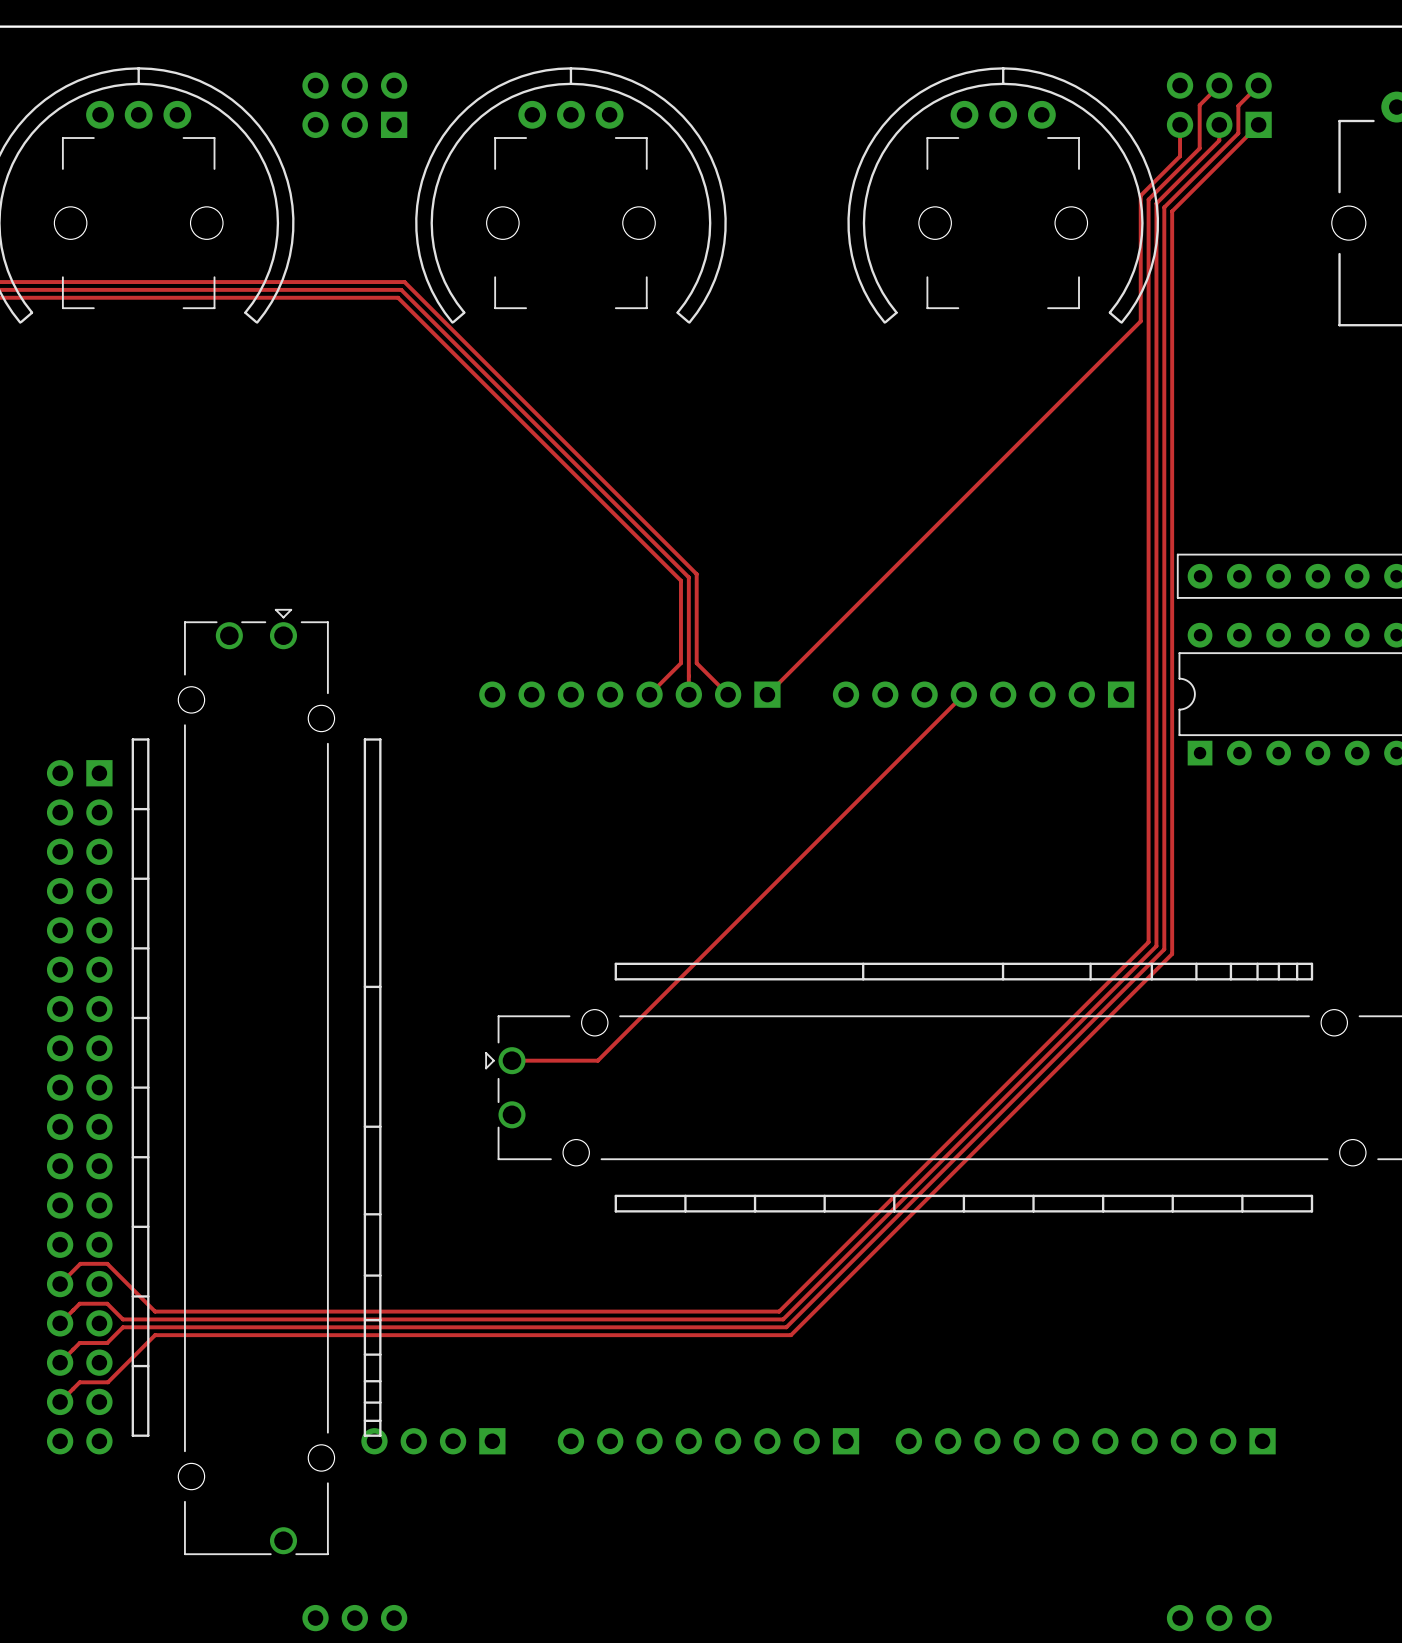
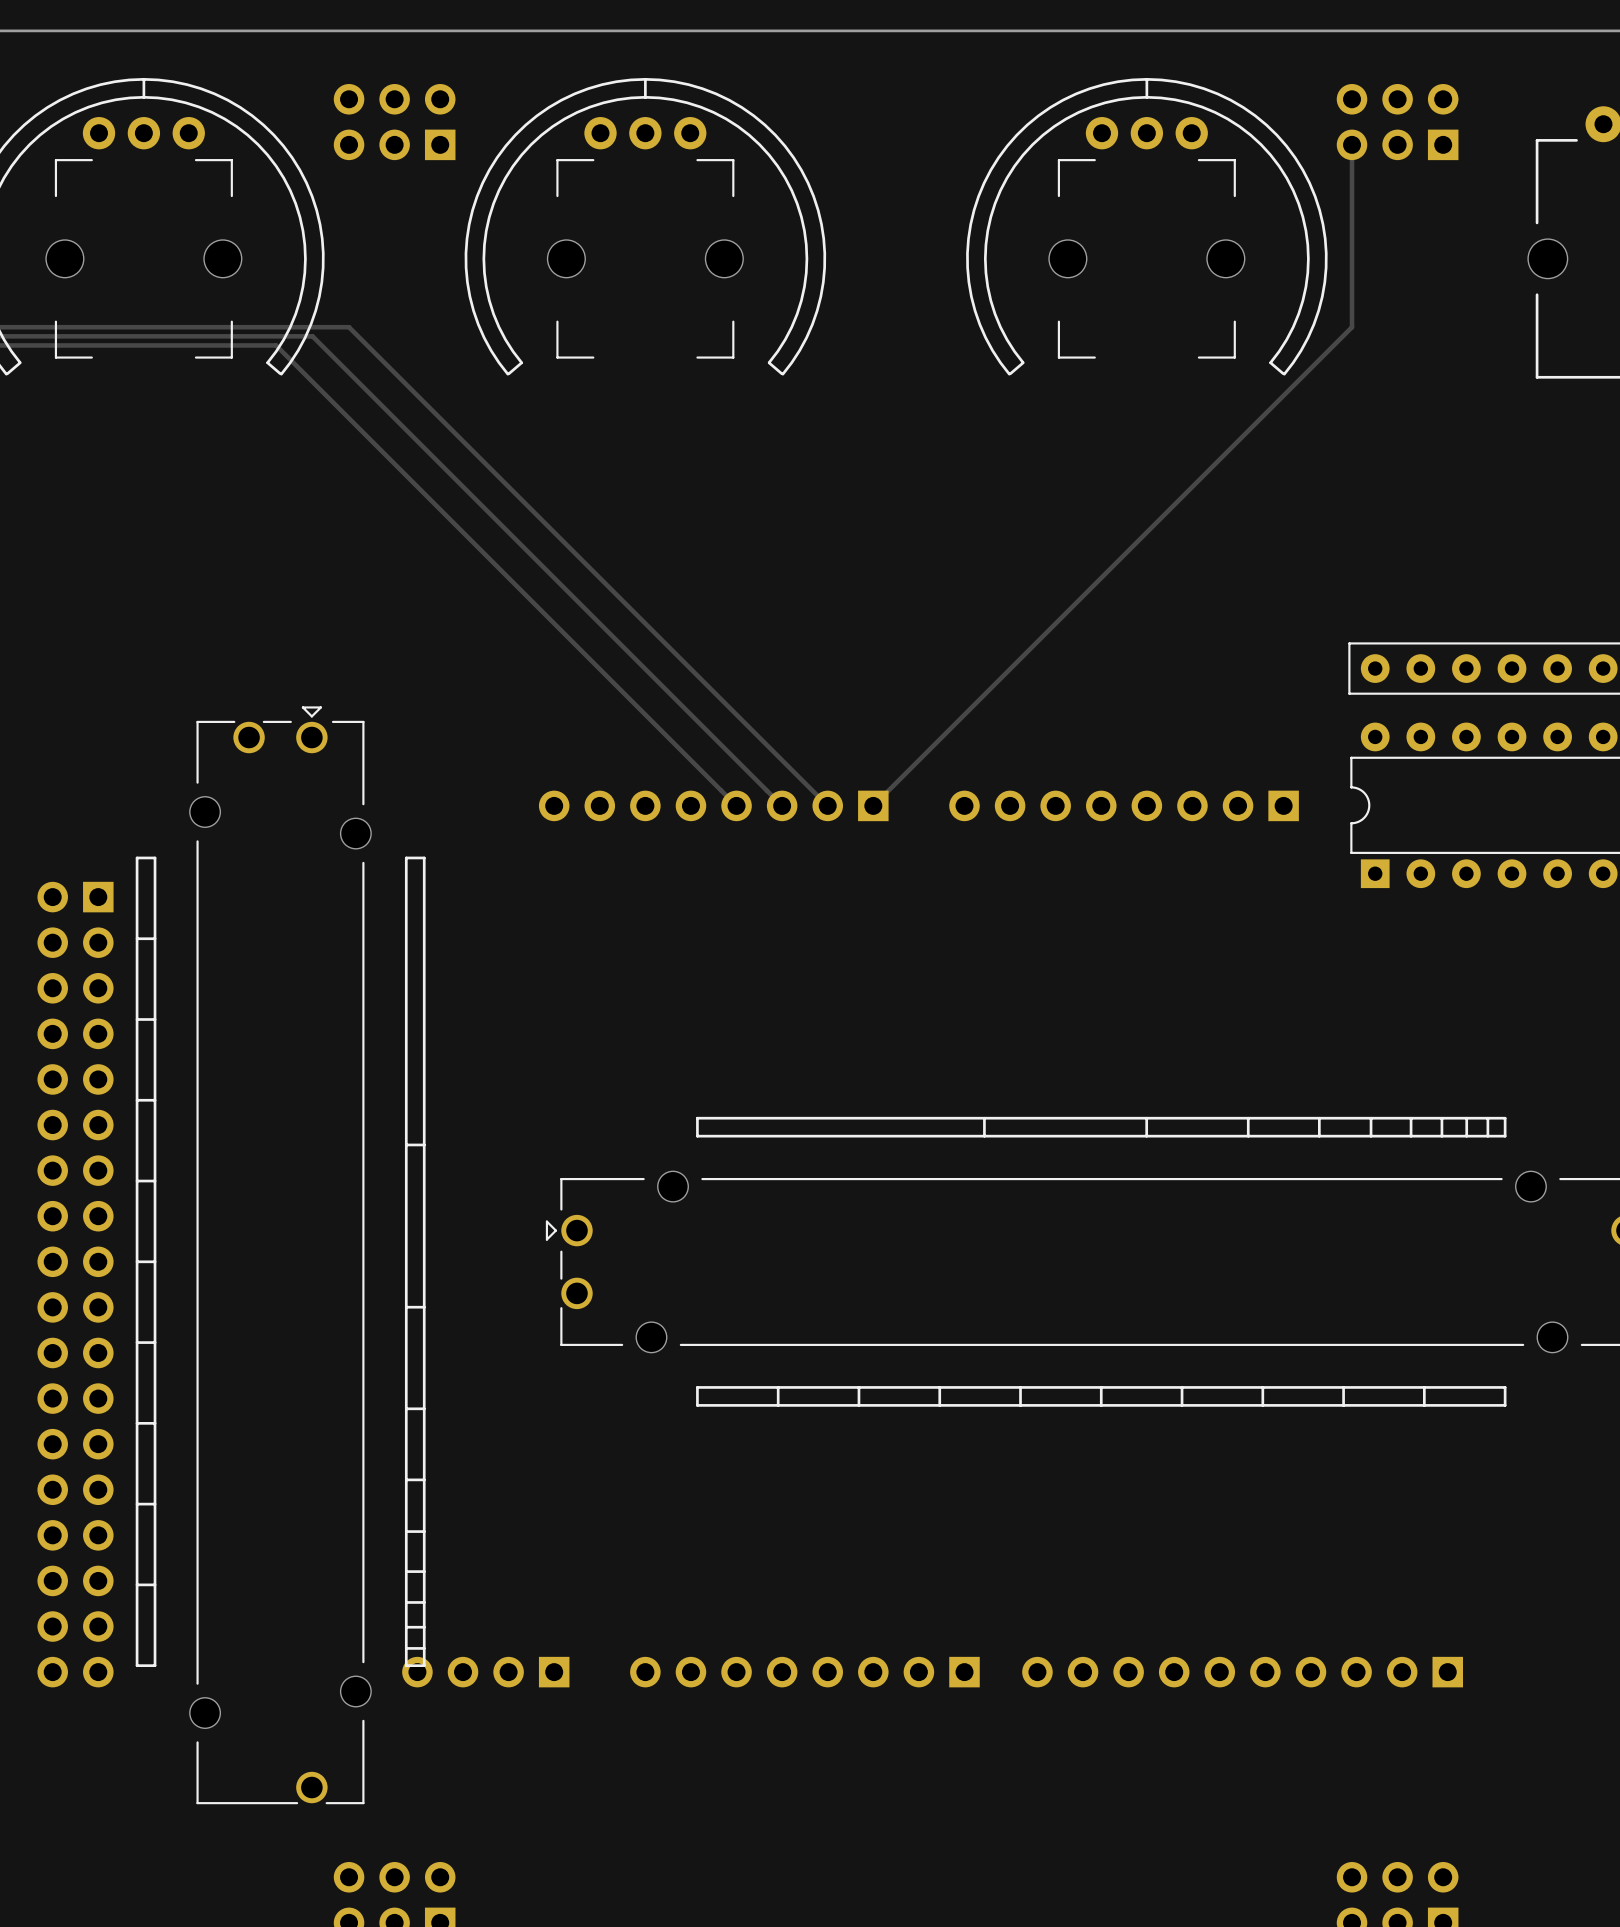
track: (1219, 85) (1199, 105) (1199, 148) (1148, 199) (1148, 942) (779, 1311) (155, 1311) (107, 1263) (80, 1263) (60, 1284) -> none
track: (1258, 85) (1238, 105) (1238, 133) (1164, 207) (1164, 949) (786, 1327) (122, 1327) (107, 1343) (79, 1343) (60, 1362) -> none
track: (1219, 124) (1219, 140) (1156, 203) (1156, 946) (783, 1319) (122, 1319) (107, 1303) (79, 1303) (60, 1323) -> none
track: (1258, 124) (1172, 211) (1172, 953) (791, 1335) (155, 1335) (107, 1382) (79, 1382) (60, 1401) -> none
track: (1180, 156) (1140, 195) (1140, 321) -> (1352, 181) (1352, 327) (1306, 372)
track: (315, 282) (404, 282) (696, 574) (696, 663) -> (349, 327) (791, 769)
track: (284, 289) (401, 289) (688, 577) (688, 694) -> (312, 336) (782, 805)
track: (252, 297) (398, 297) (680, 580) (680, 663) (649, 694) -> (276, 345) (736, 805)
track: (963, 694) (597, 1060) (512, 1060) -> none

